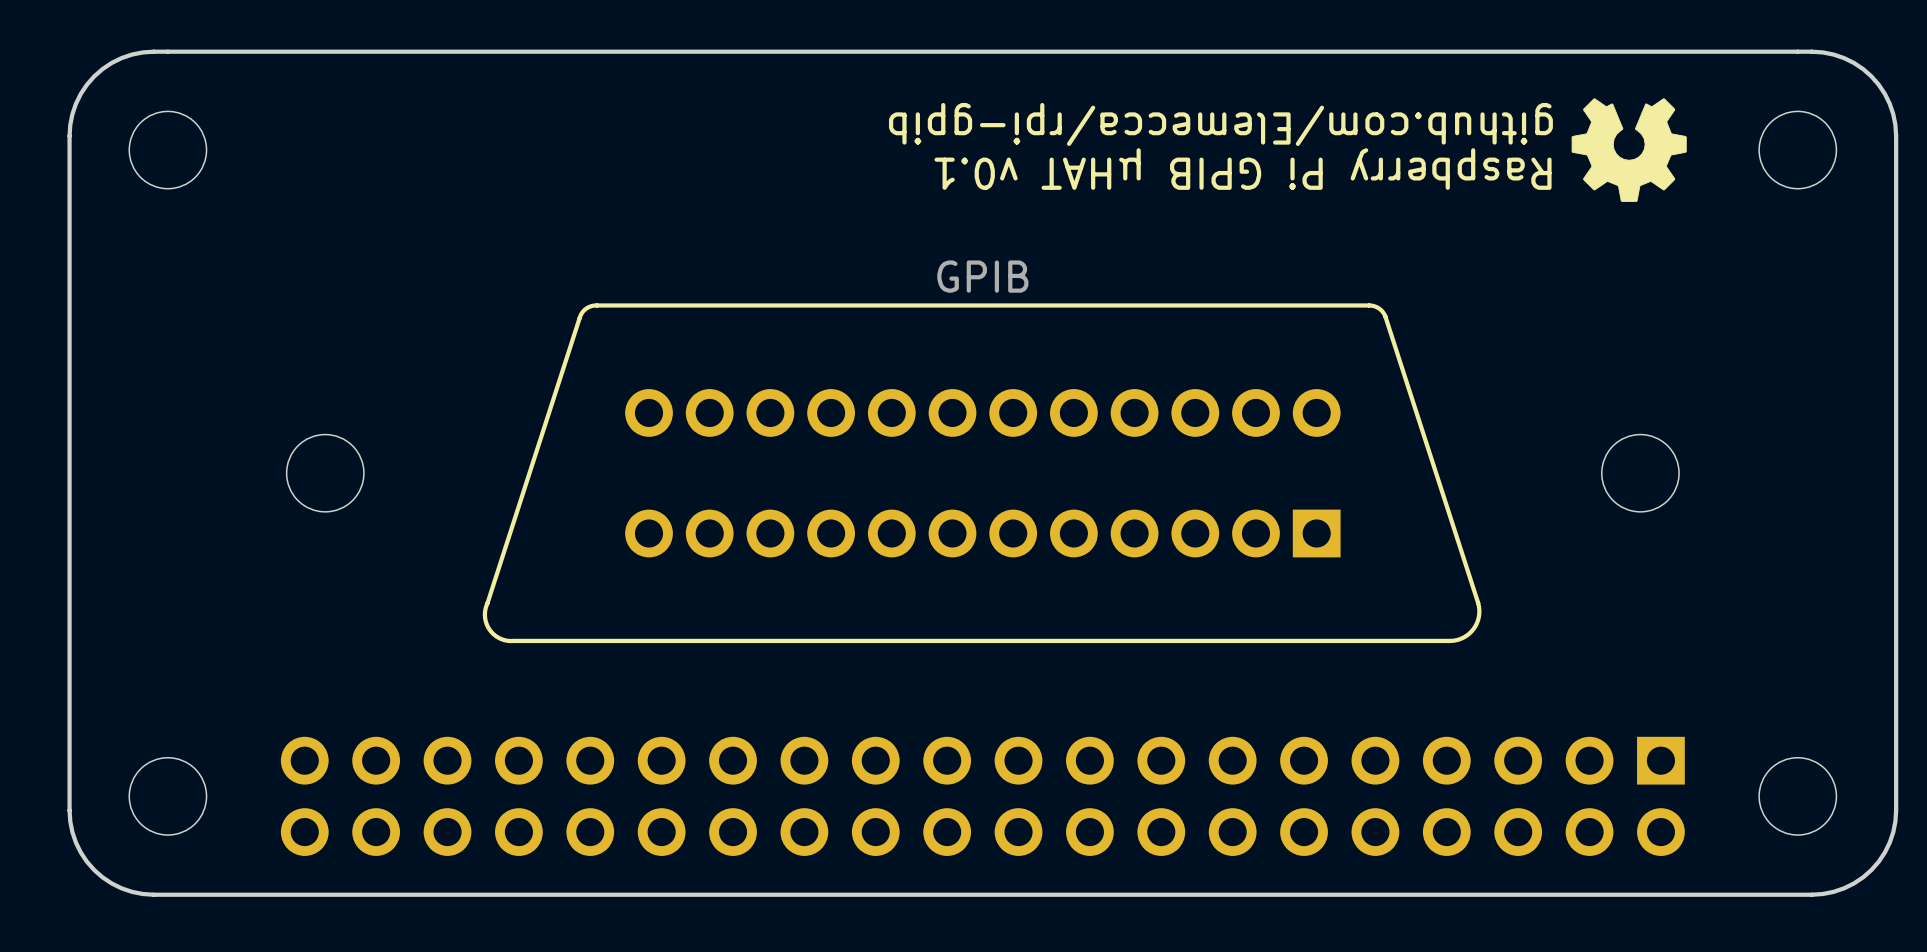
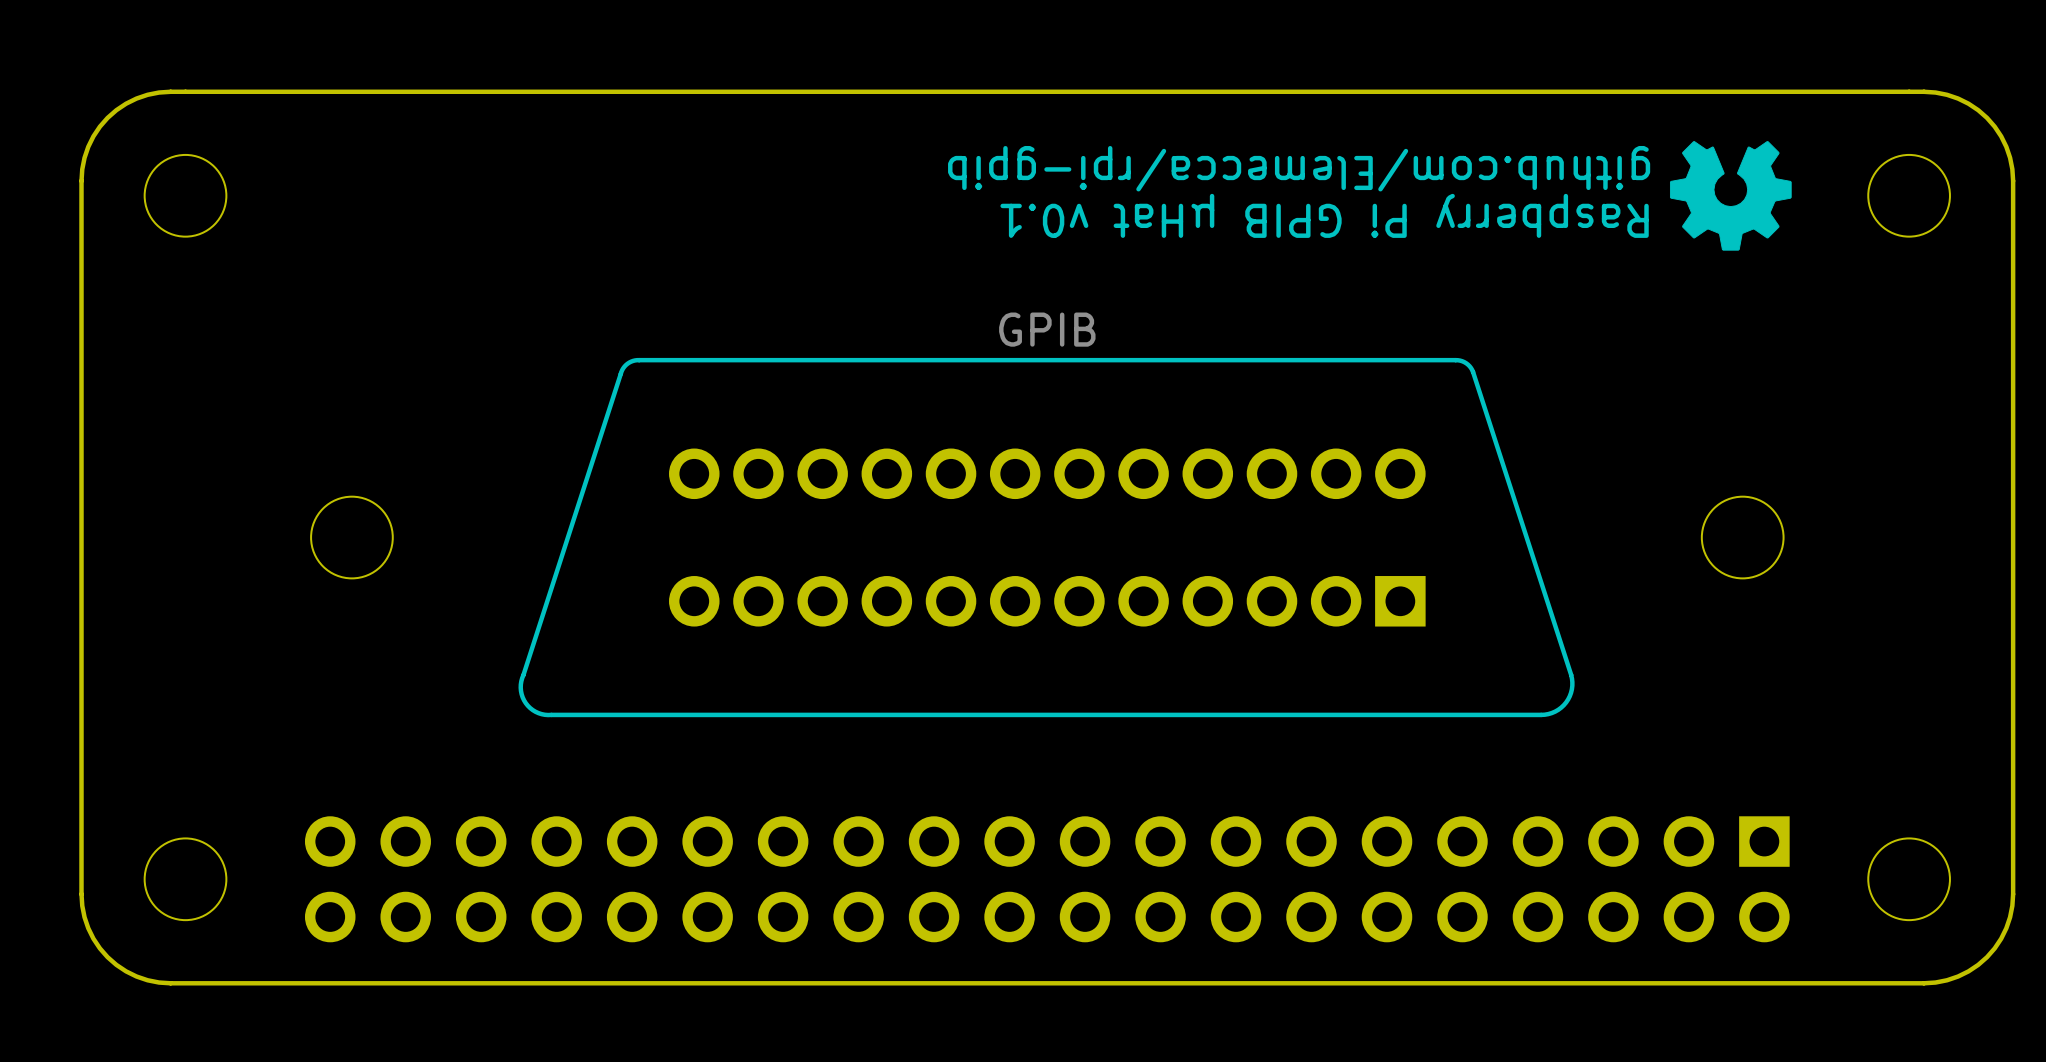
text: Raspberry Pi GPIB µHAT v0.1 (1243, 169) -> Raspberry Pi GPIB µHat v0.1 (1324, 215)

